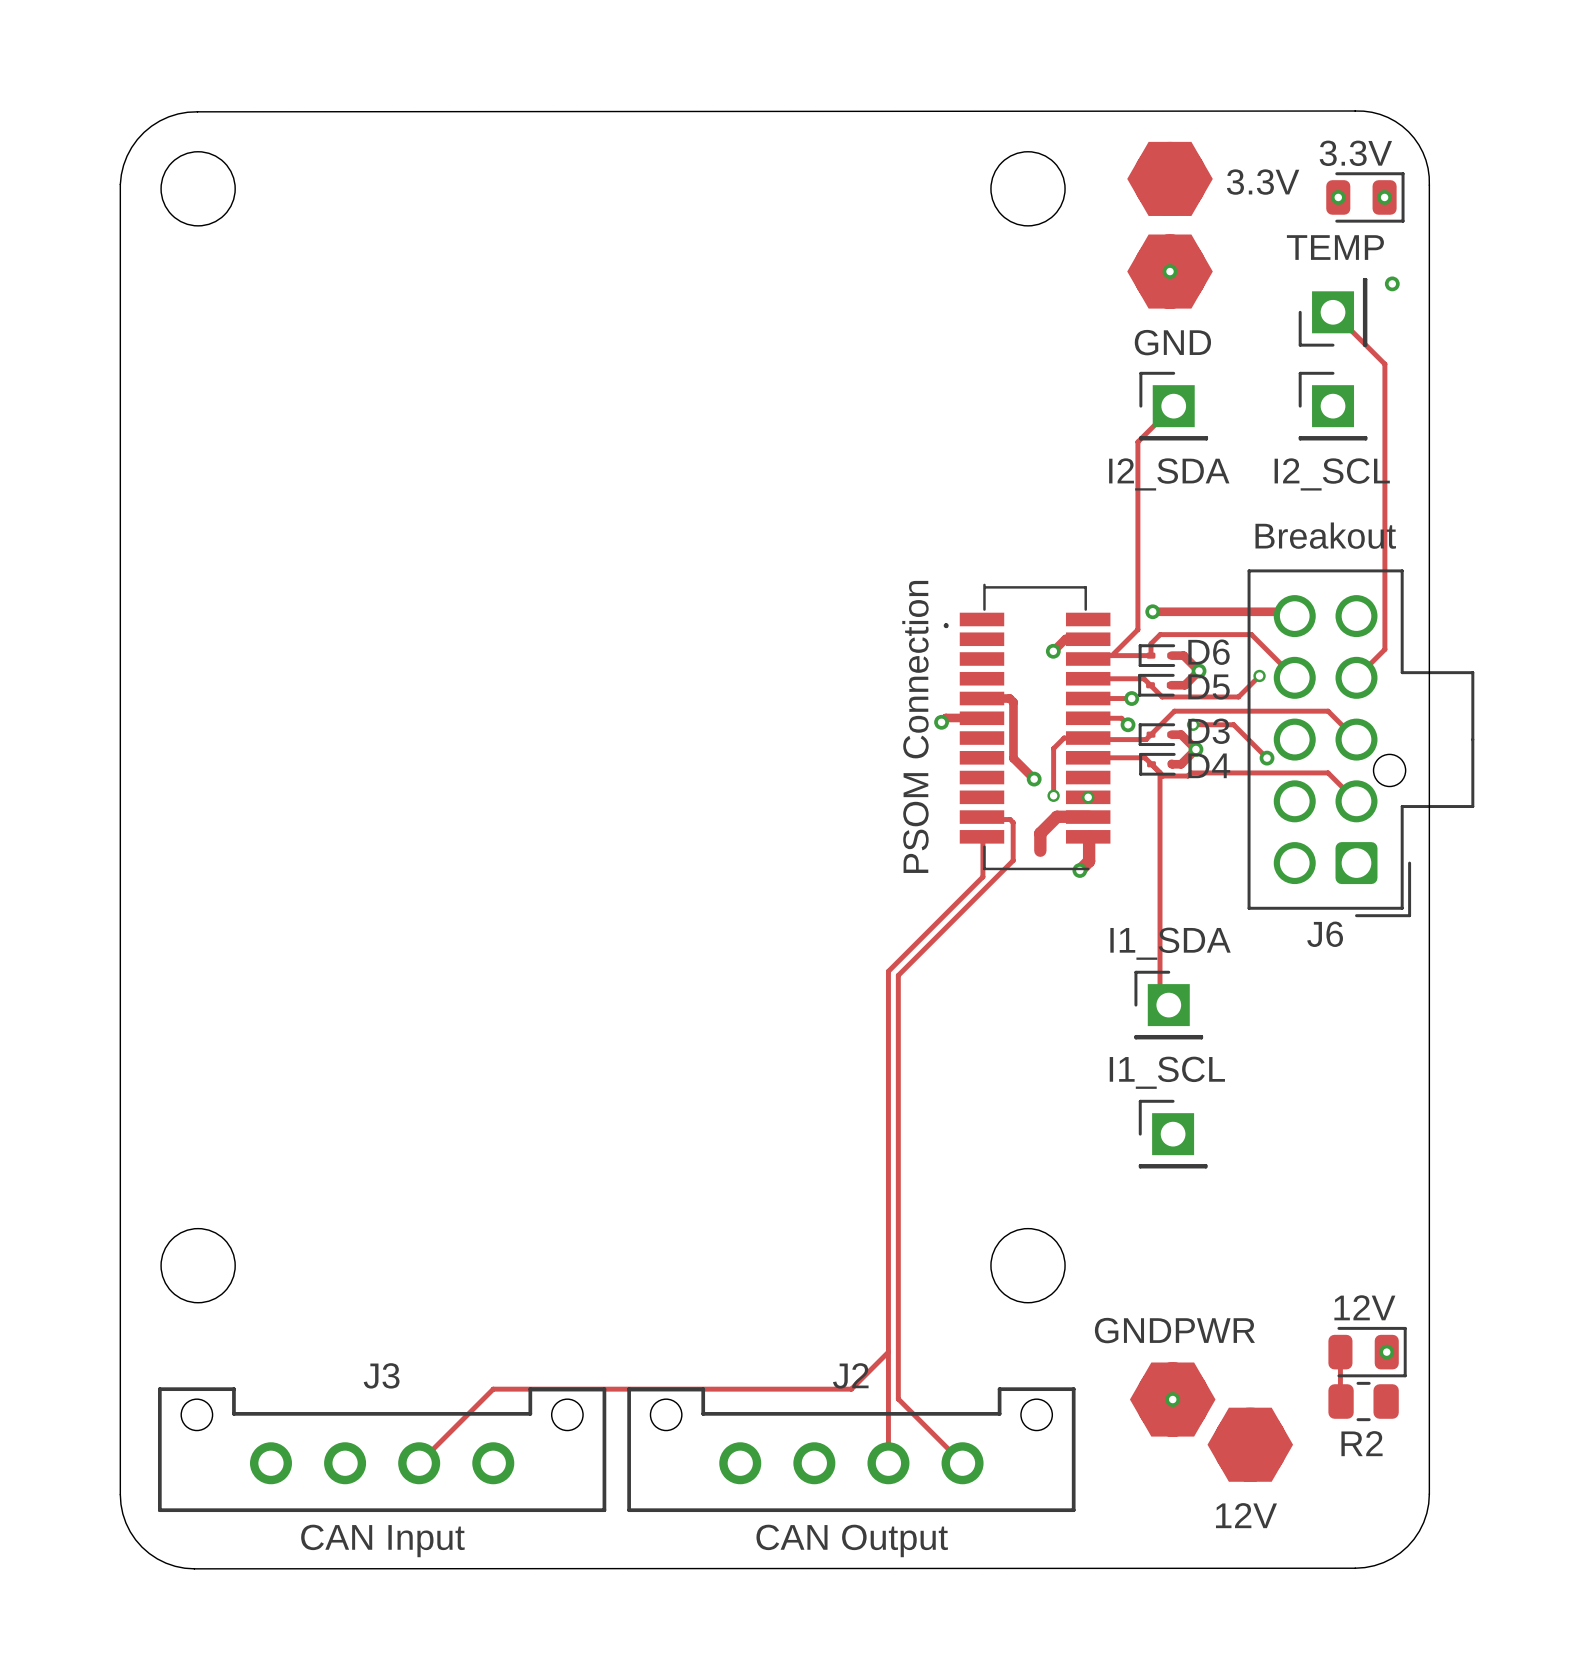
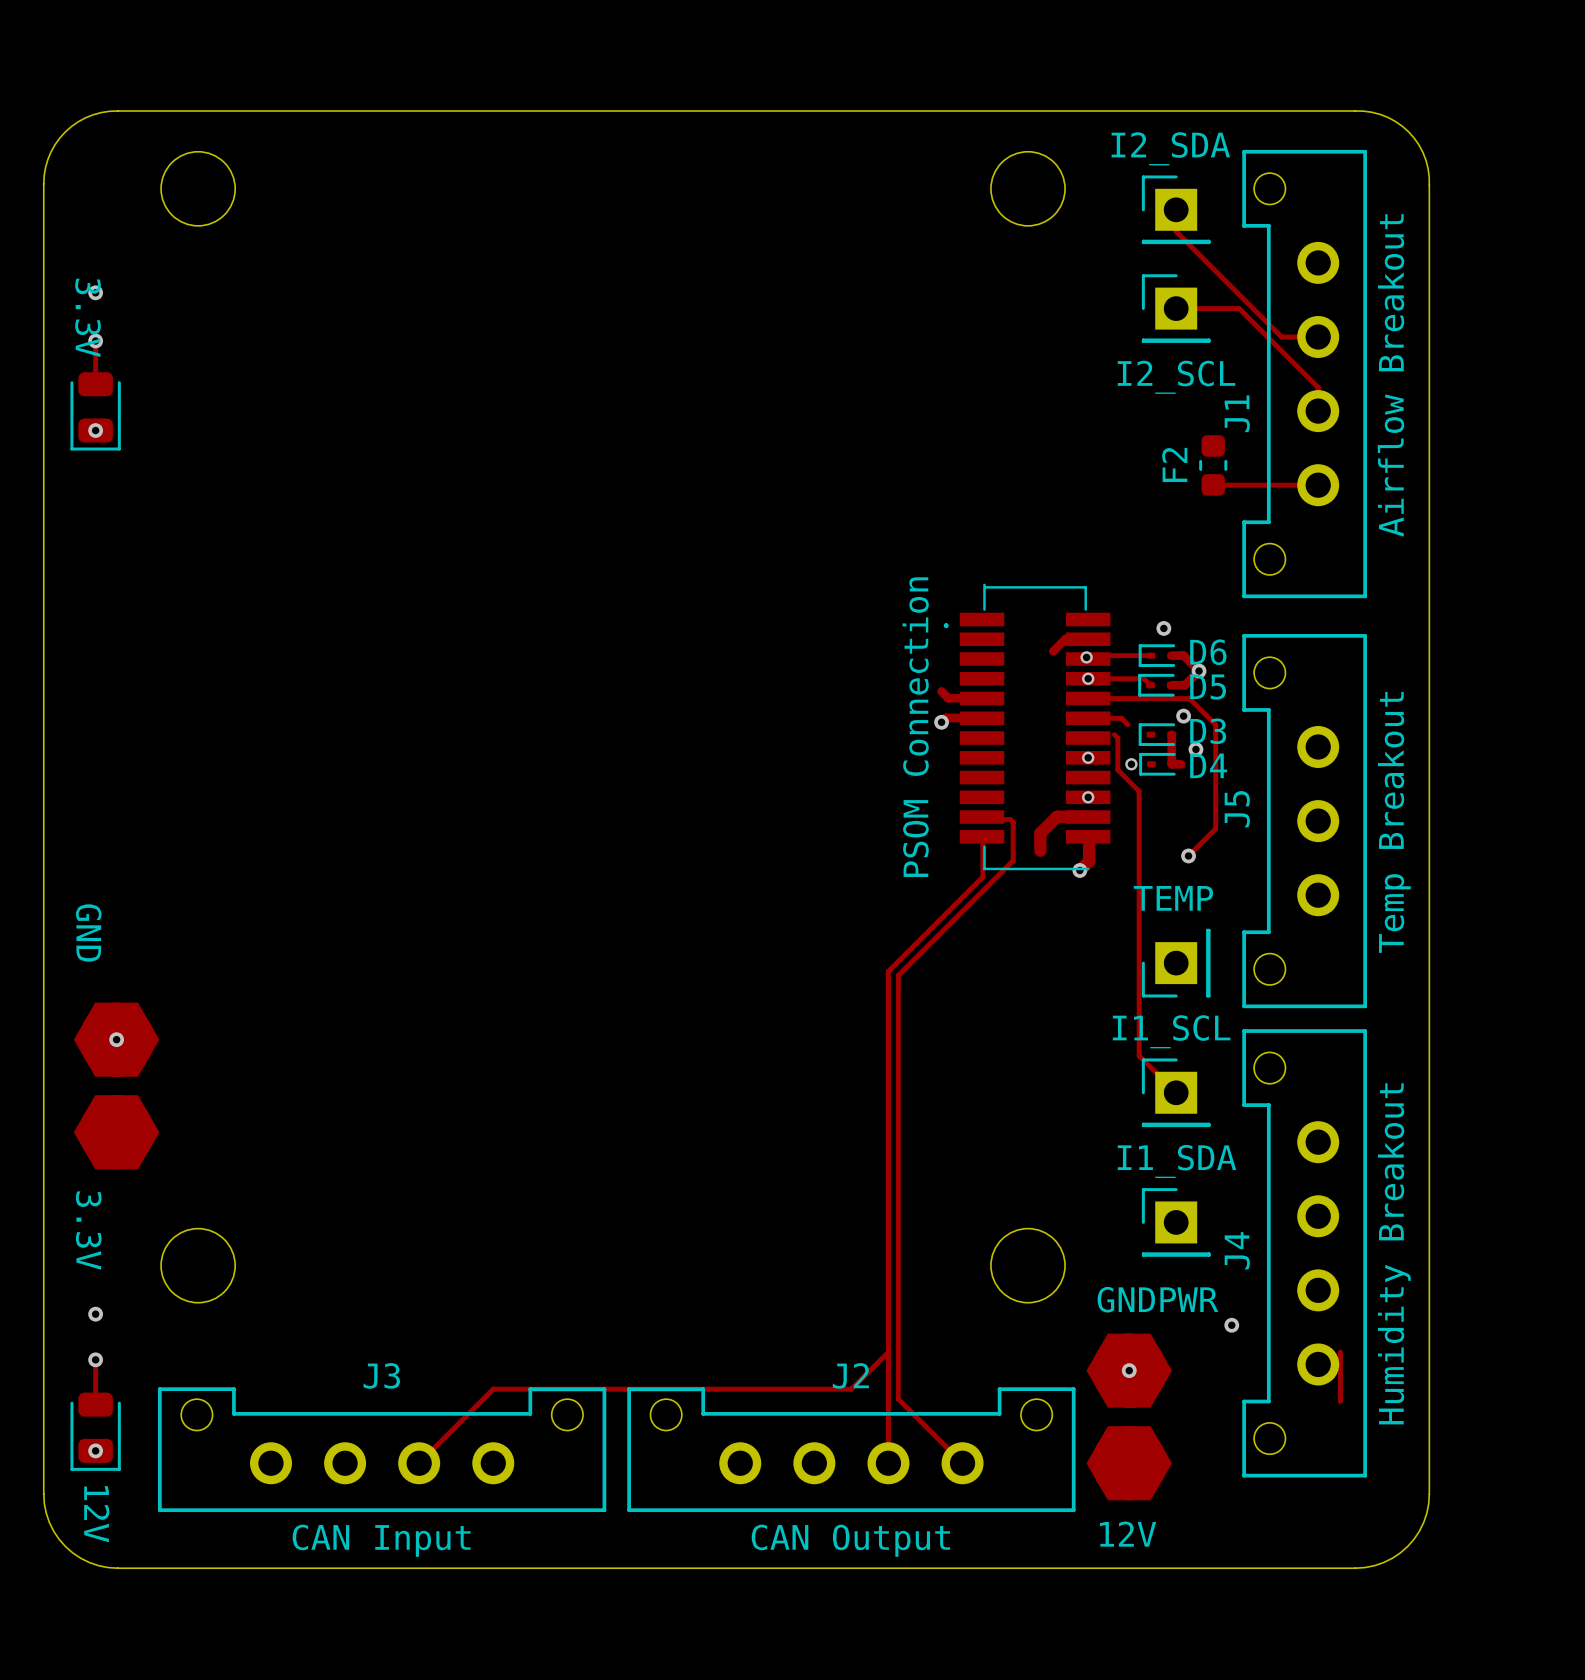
board edge: (1355, 111) (197, 111) (168, 116) (151, 126) (137, 139) (123, 165) (120, 184) (120, 1494) (125, 1523) (142, 1547) (166, 1563) (194, 1568) (1355, 1568) -> (1355, 111) (109, 111) (85, 117) (71, 126) (59, 137) (47, 159) (43, 183) (43, 1494) (49, 1522) (65, 1546) (89, 1562) (117, 1568) (1355, 1568)
part: (1170, 178) -> none
text: 3.3V (1263, 182) -> none
via: (1338, 197) -> none
part: 3.3V (1365, 197) -> none
via: (1384, 197) -> none
track: none -> (1176, 209) (1176, 231) (1281, 337) (1318, 337)
part: none -> (1176, 209)
text: TEMP (1335, 247) -> none
part: (1170, 271) -> none
via: (1170, 271) -> none
via: (1392, 283) -> none
via: none -> (95, 292)
track: none -> (1176, 308) (1239, 308) (1318, 387) (1318, 411)
part: none -> (1176, 308)
track: (1333, 312) (1384, 364) (1384, 649) (1356, 677) -> none
part: (1333, 312) -> none
track: none -> (95, 341) (95, 384)
via: none -> (95, 341)
text: GND (1172, 342) -> none
J1: none -> (1304, 374)
track: (1173, 406) (1137, 441) (1137, 629) (1111, 655) -> none
part: (1173, 406) -> none
part: (1333, 406) -> none
part: none -> 3.3V (95, 411)
via: none -> (95, 430)
F2: none -> (1213, 465)
text position: I2_SDA (1169, 474) -> I2_SDA (1170, 148)
text position: I2_SCL (1332, 474) -> I2_SCL (1176, 377)
track: none -> (1213, 485) (1318, 485)
text: Breakout (1325, 535) -> Airflow Breakout (1391, 375)
track: (1152, 611) (1290, 611) (1294, 616) -> none
via position: (1152, 611) -> (1163, 628)
via: (1053, 651) -> none
track: (1151, 655) (1151, 643) (1160, 634) (1251, 634) (1294, 677) -> none
via: none -> (1086, 657)
track: (1259, 675) (1238, 696) (1162, 696) (1150, 685) -> none
via: (1259, 675) -> none
via: none -> (1088, 678)
track: (981, 698) (1009, 698) (1013, 702) (1013, 758) (1034, 779) -> (982, 698) (948, 698) (941, 691)
track: none -> (1131, 698) (1189, 698) (1215, 724) (1215, 828) (1188, 855)
via: (1131, 698) -> none
via: (1128, 724) -> none
track: (1193, 724) (1233, 724) (1267, 758) -> none
via position: (1193, 724) -> (1183, 716)
track: none -> (1114, 734) (1117, 738) (1117, 769) (1139, 791) (1139, 1055) (1176, 1092)
track: (1171, 734) (1181, 734) (1195, 749) (1181, 764) -> (1171, 734) (1171, 763)
track: (1356, 739) (1328, 711) (1174, 711) (1146, 739) (1064, 738) (1053, 748) (1053, 795) -> none
J6: (1360, 743) -> none
track: (1088, 757) (1145, 757) (1163, 776) (1187, 776) (1191, 772) (1328, 772) (1356, 801) -> none
via: none -> (1088, 757)
via: (1267, 758) -> none
via: none -> (1131, 764)
track: (1160, 772) (1160, 996) (1168, 1005) -> none
via: (1034, 779) -> none
via: (1053, 795) -> none
text: none -> Temp Breakout (1394, 822)
J5: none -> (1304, 821)
via: none -> (1188, 855)
text: none -> TEMP (1173, 898)
text: none -> GND (88, 932)
text position: I1_SDA (1170, 943) -> I1_SDA (1176, 1161)
part rotation: 0° (1168, 1005) -> 90° counterclockwise (1176, 963)
part position: (1168, 1005) -> (1176, 963)
part: none -> (116, 1039)
via: none -> (116, 1039)
text position: I1_SCL (1167, 1072) -> I1_SCL (1171, 1031)
part: none -> (116, 1132)
part position: (1173, 1134) -> (1176, 1092)
part: none -> (1176, 1222)
text: none -> 3.3V (88, 1230)
text: none -> Humidity Breakout (1394, 1253)
J4: none -> (1304, 1253)
via: none -> (95, 1314)
via: none -> (1231, 1325)
text position: GNDPWR (1174, 1330) -> GNDPWR (1157, 1299)
part: 12V (1367, 1352) -> none
via: (1386, 1352) -> none
track: none -> (95, 1359) (95, 1404)
via: none -> (95, 1359)
part: none -> (1129, 1370)
via: none -> (1129, 1370)
part: (1172, 1399) -> none
via: (1172, 1399) -> none
R2: (1363, 1401) -> none
part: none -> 12V (95, 1431)
part: (1250, 1444) -> none
via: none -> (95, 1450)
part: none -> (1129, 1463)
text position: 12V (1246, 1515) -> 12V (1128, 1534)

